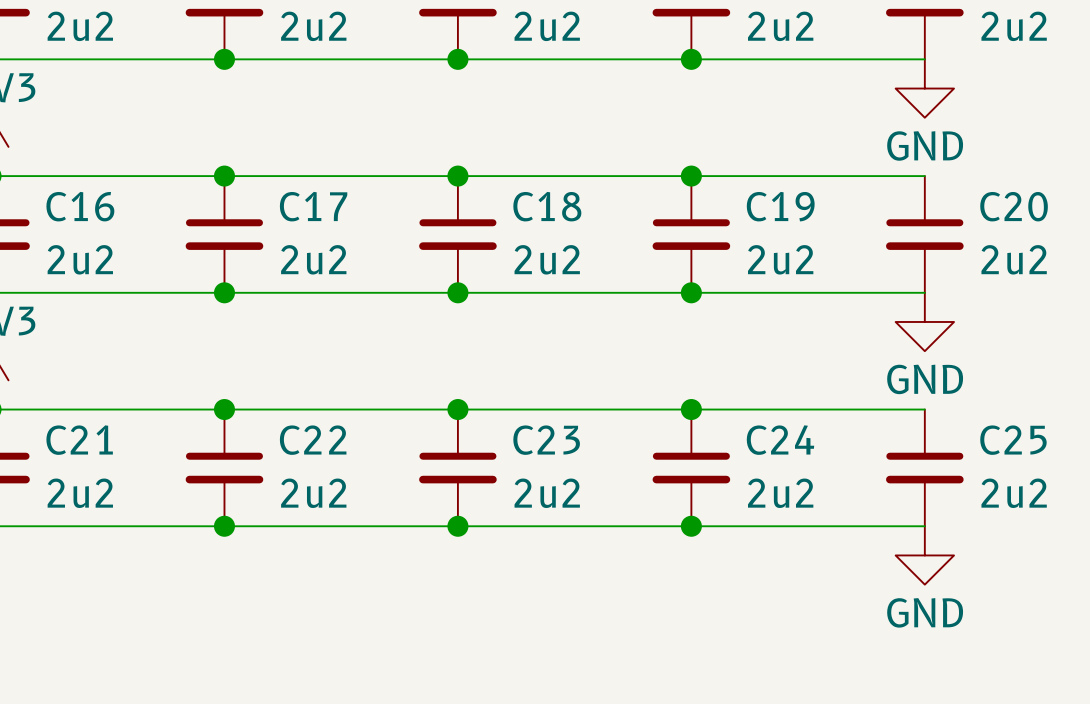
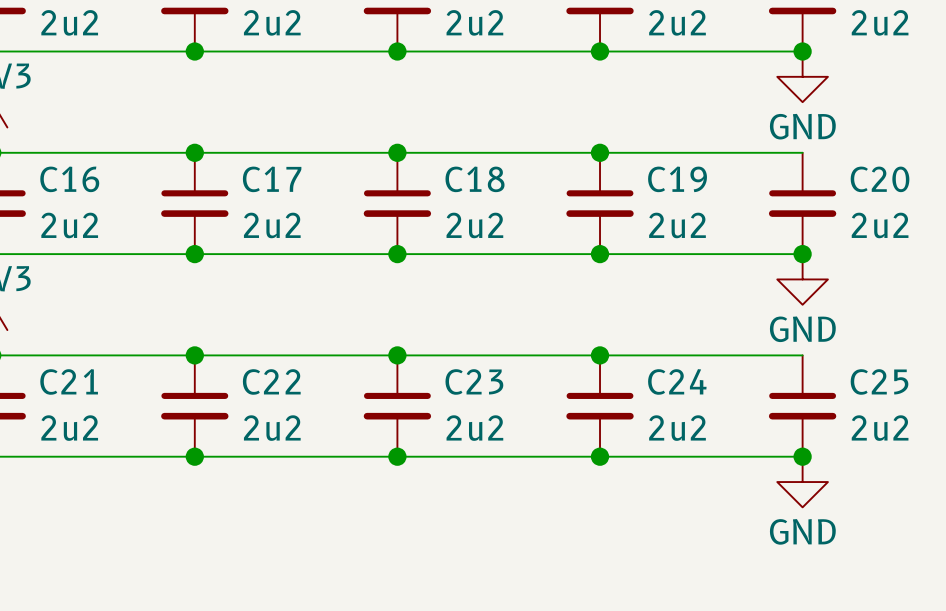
junction: none -> (802, 51)
junction: none -> (802, 254)
junction: none -> (802, 456)

